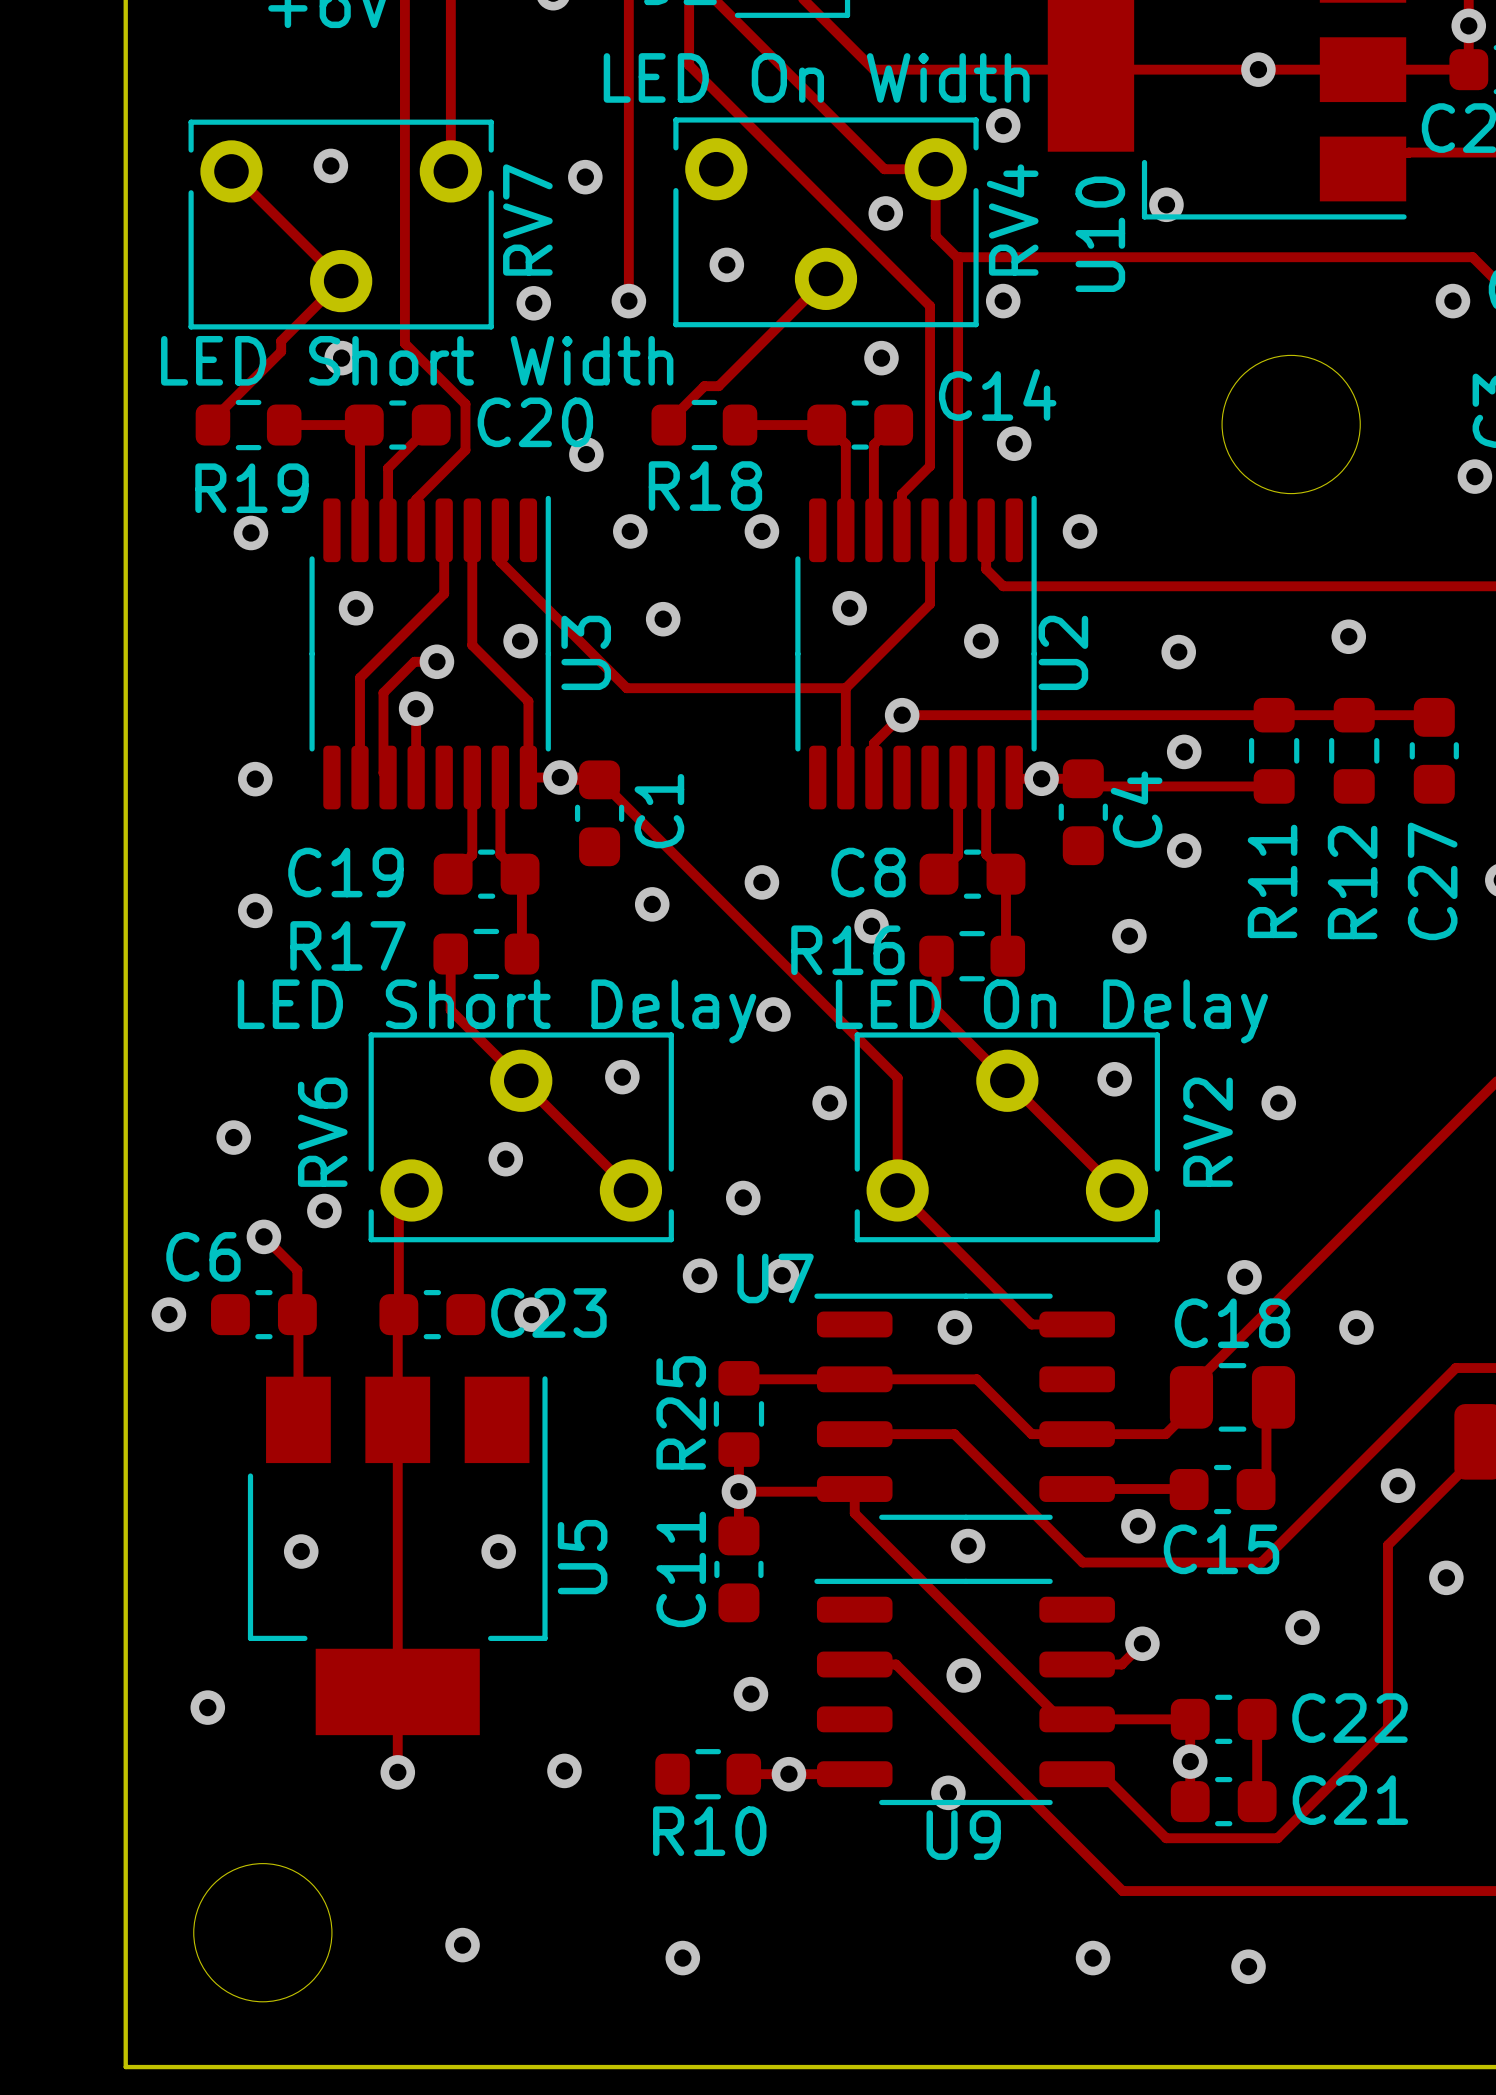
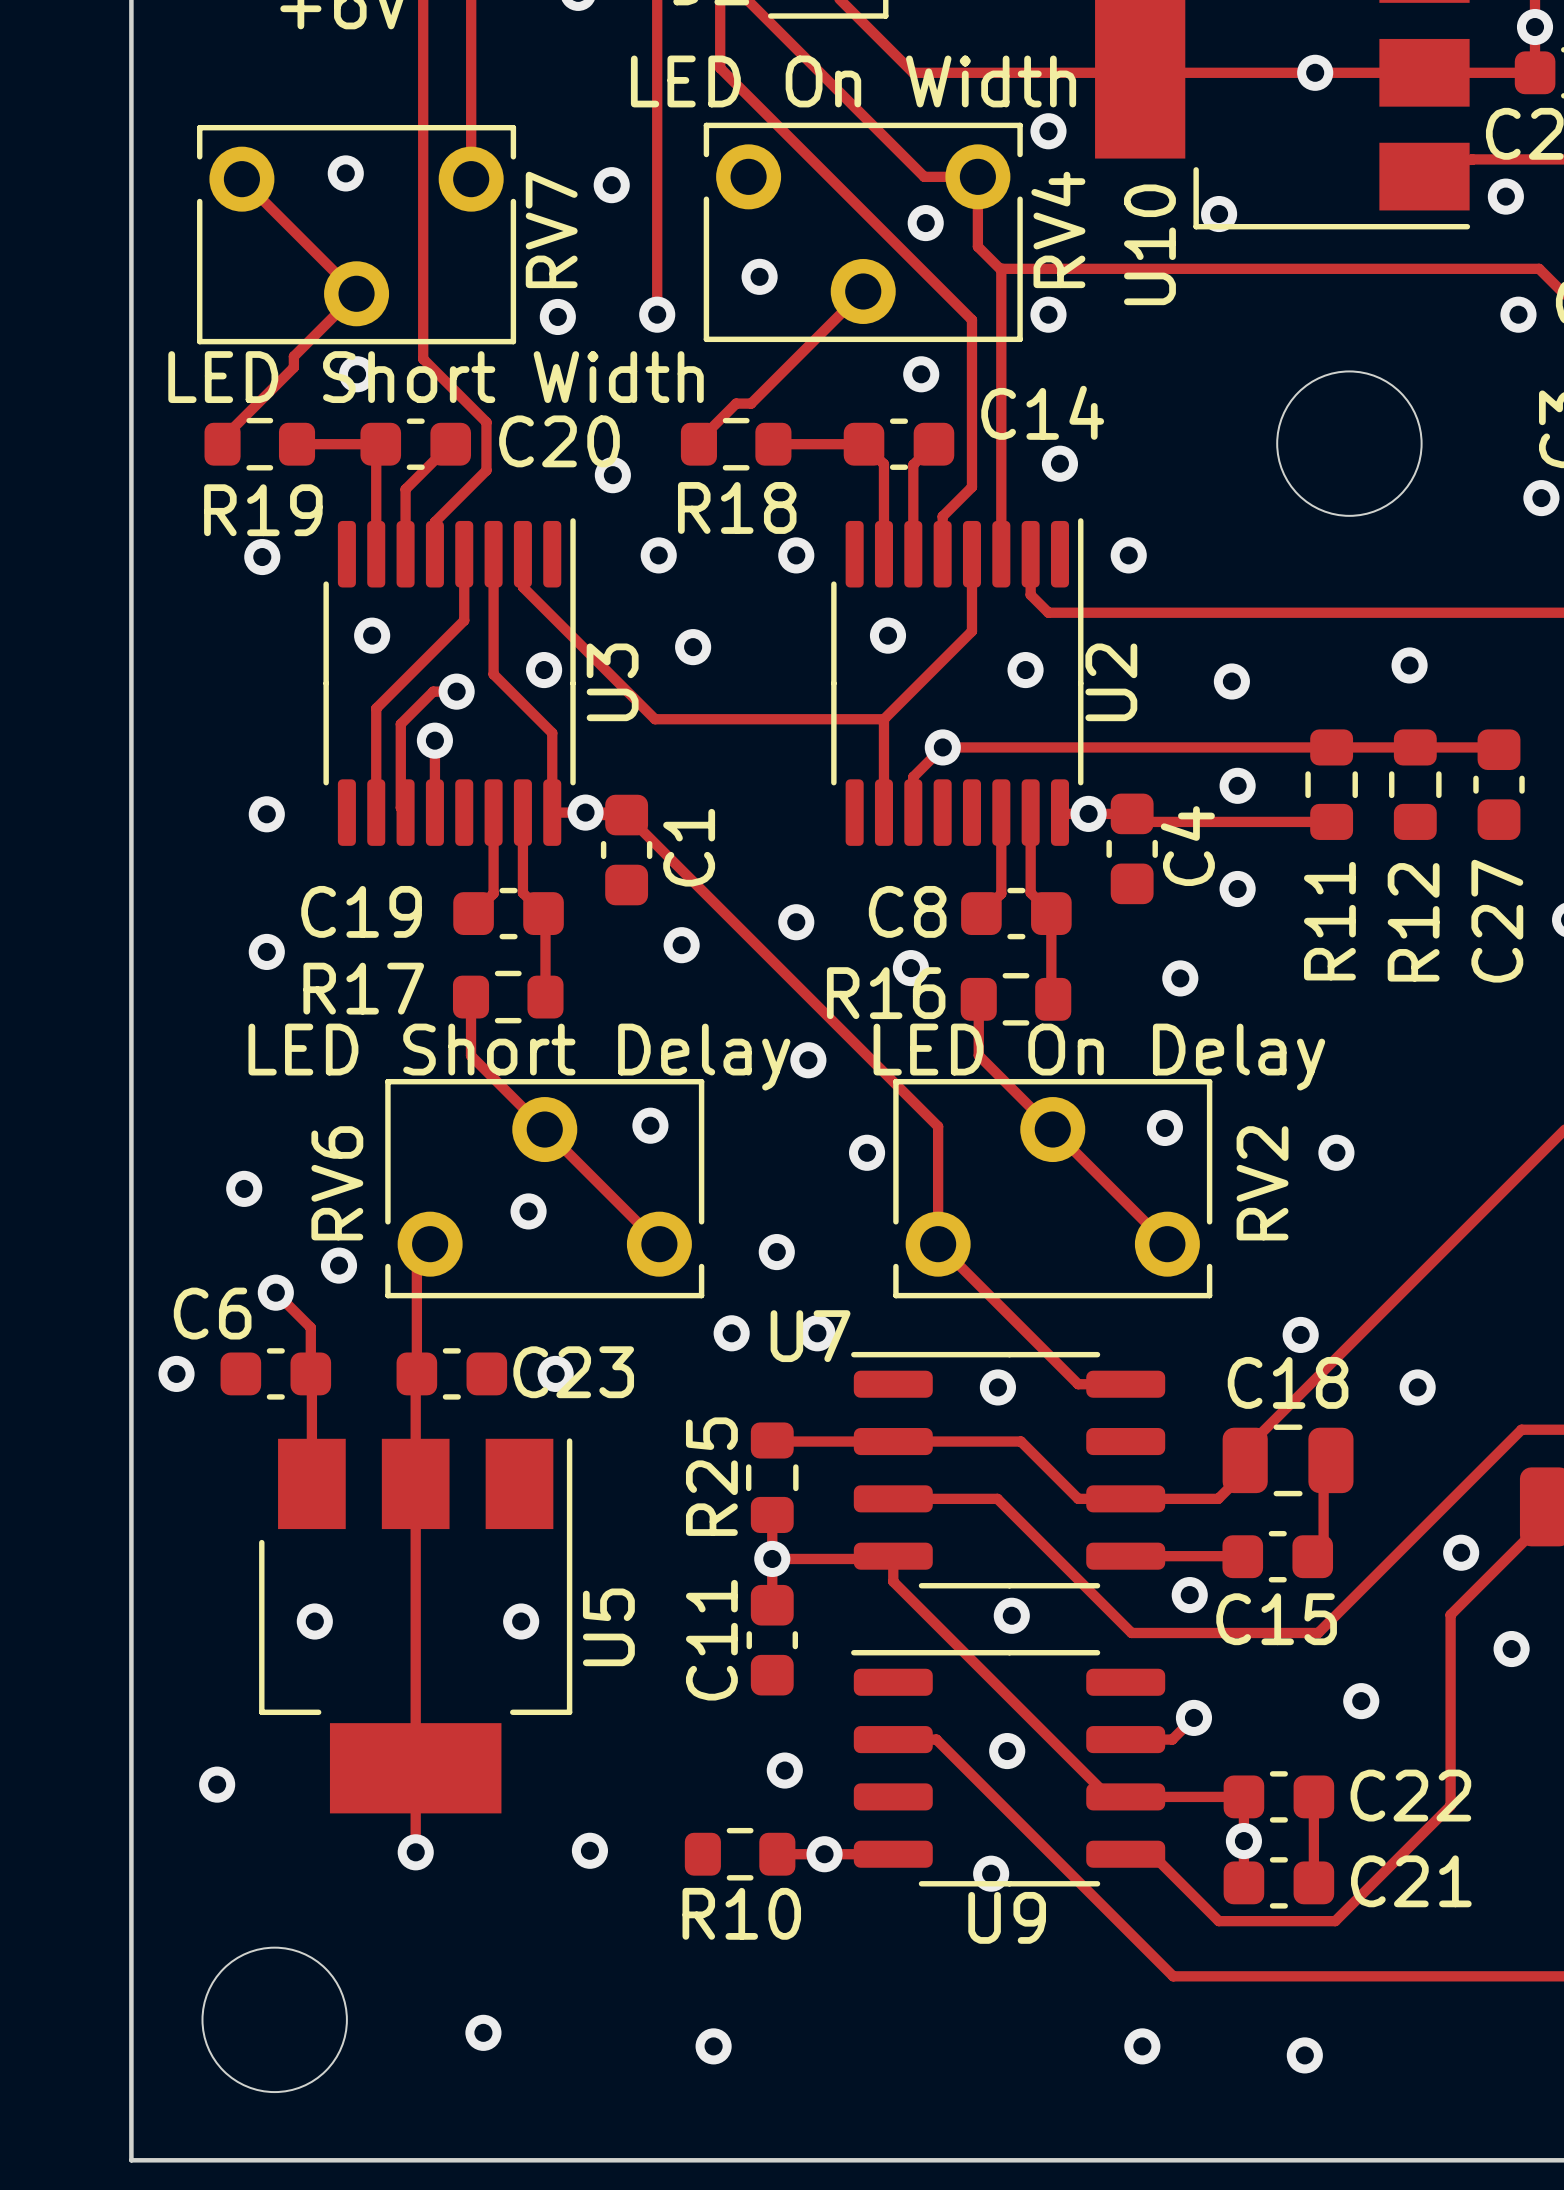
via: none -> (1505, 196)

